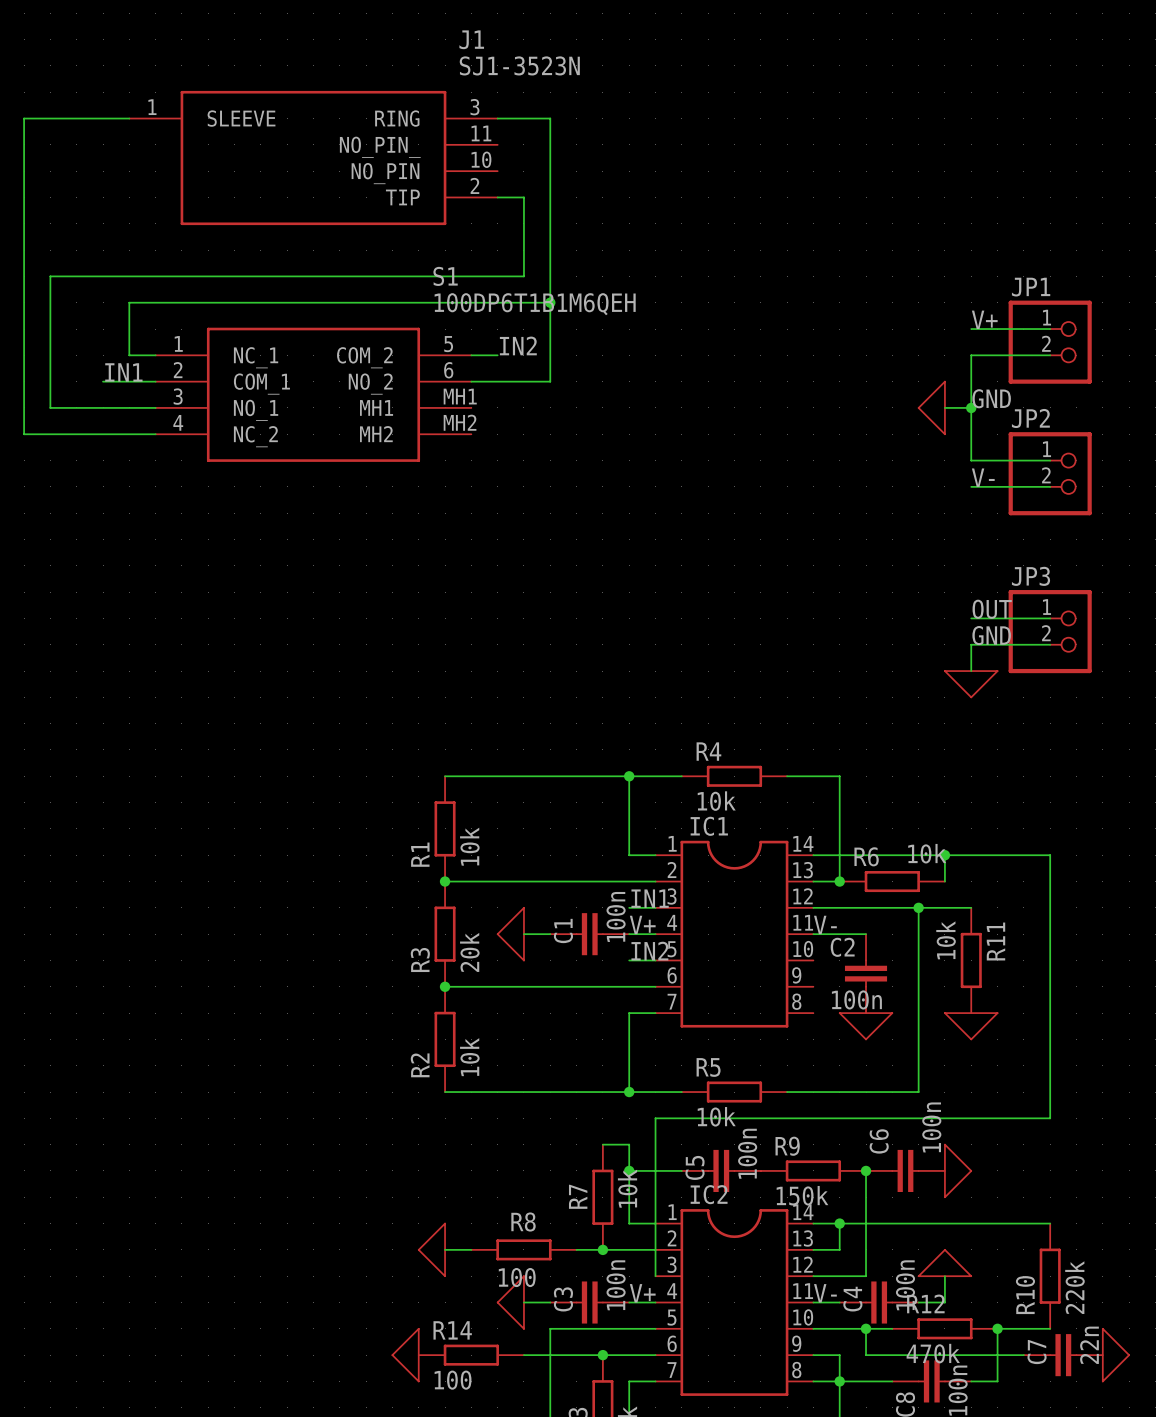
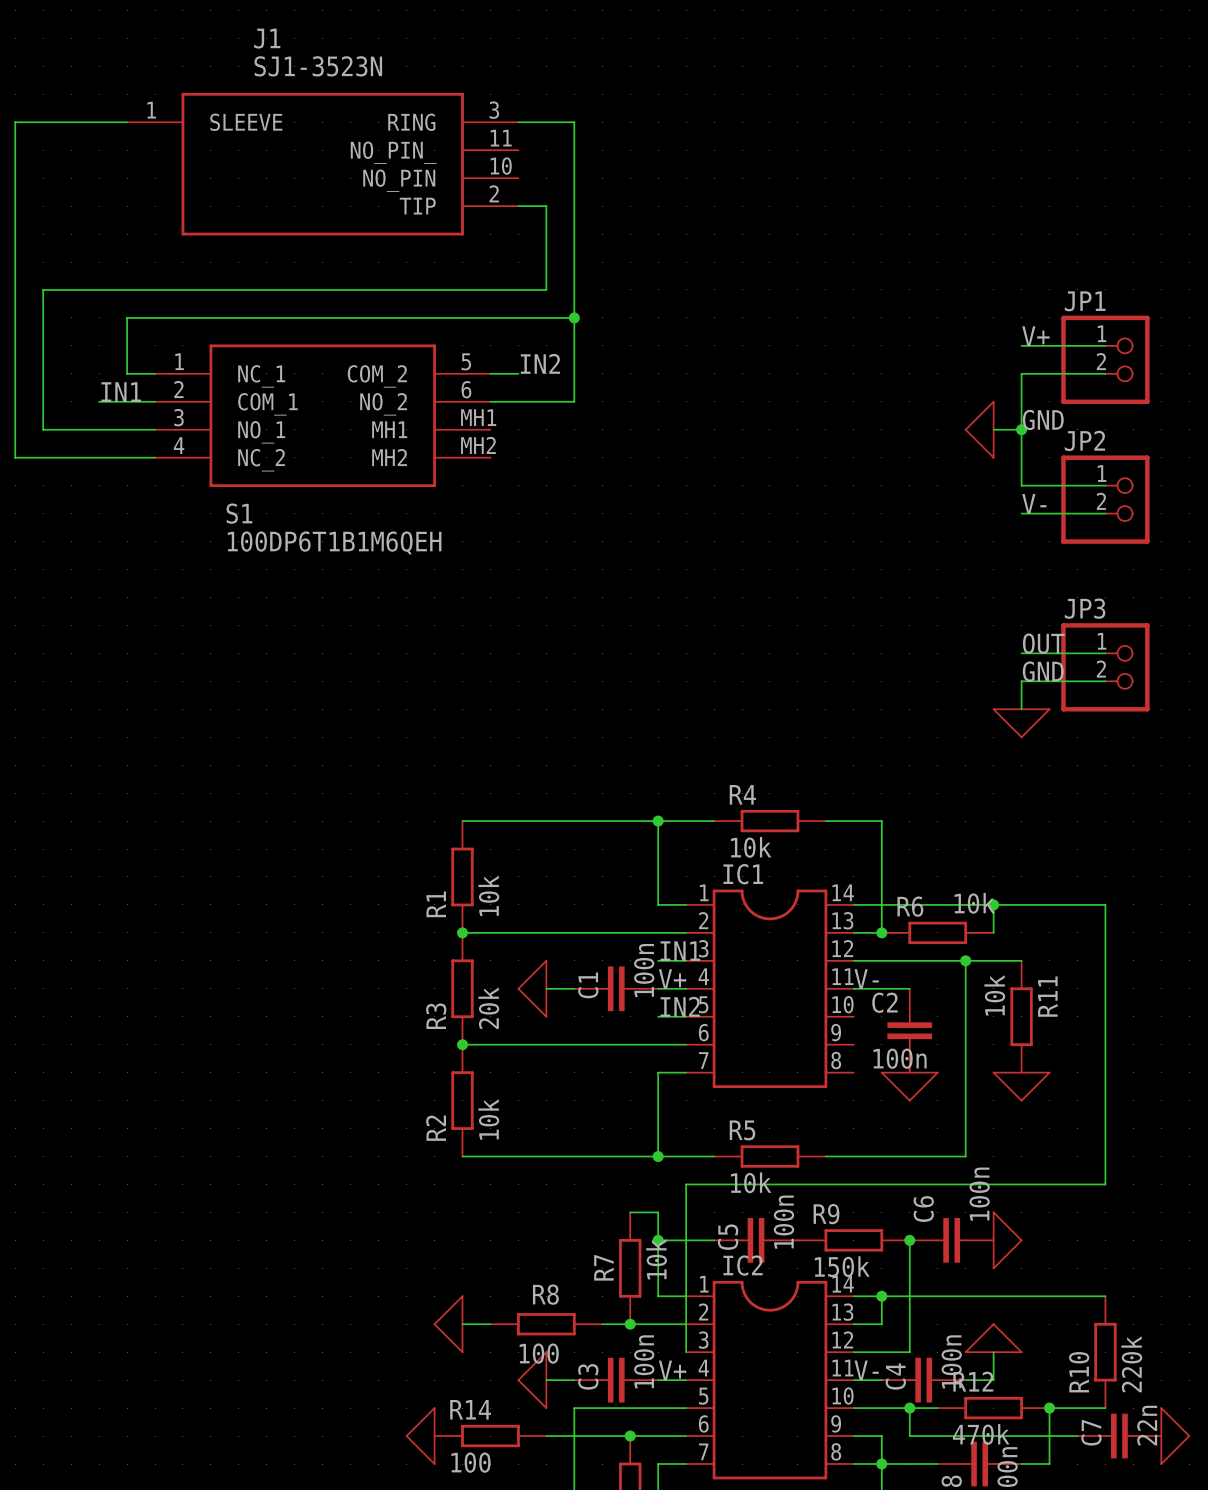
J1 name position: J1 (471, 39) -> J1 (267, 38)
J1 value position: SJ1-3523N (519, 65) -> SJ1-3523N (318, 66)
S1 name position: S1 (445, 276) -> S1 (239, 513)
S1 value position: 100DP6T1B1M6QEH (535, 304) -> 100DP6T1B1M6QEH (334, 543)

